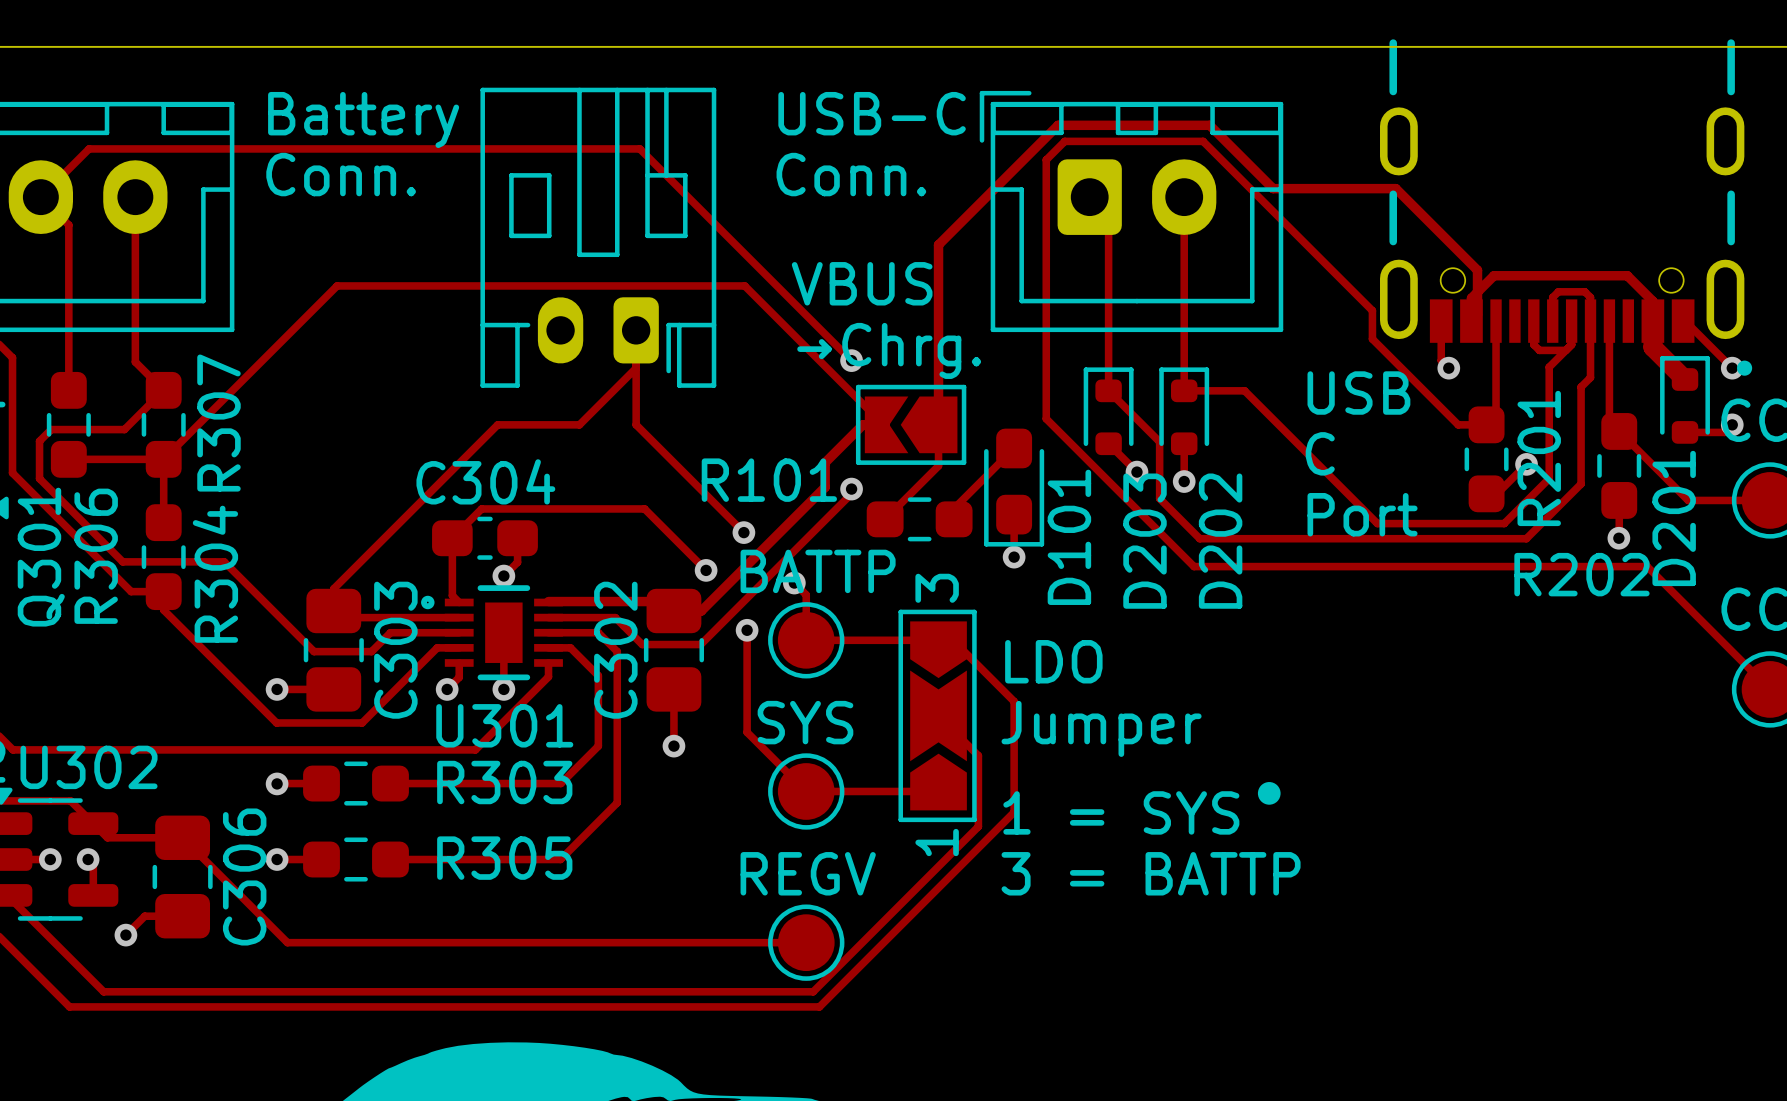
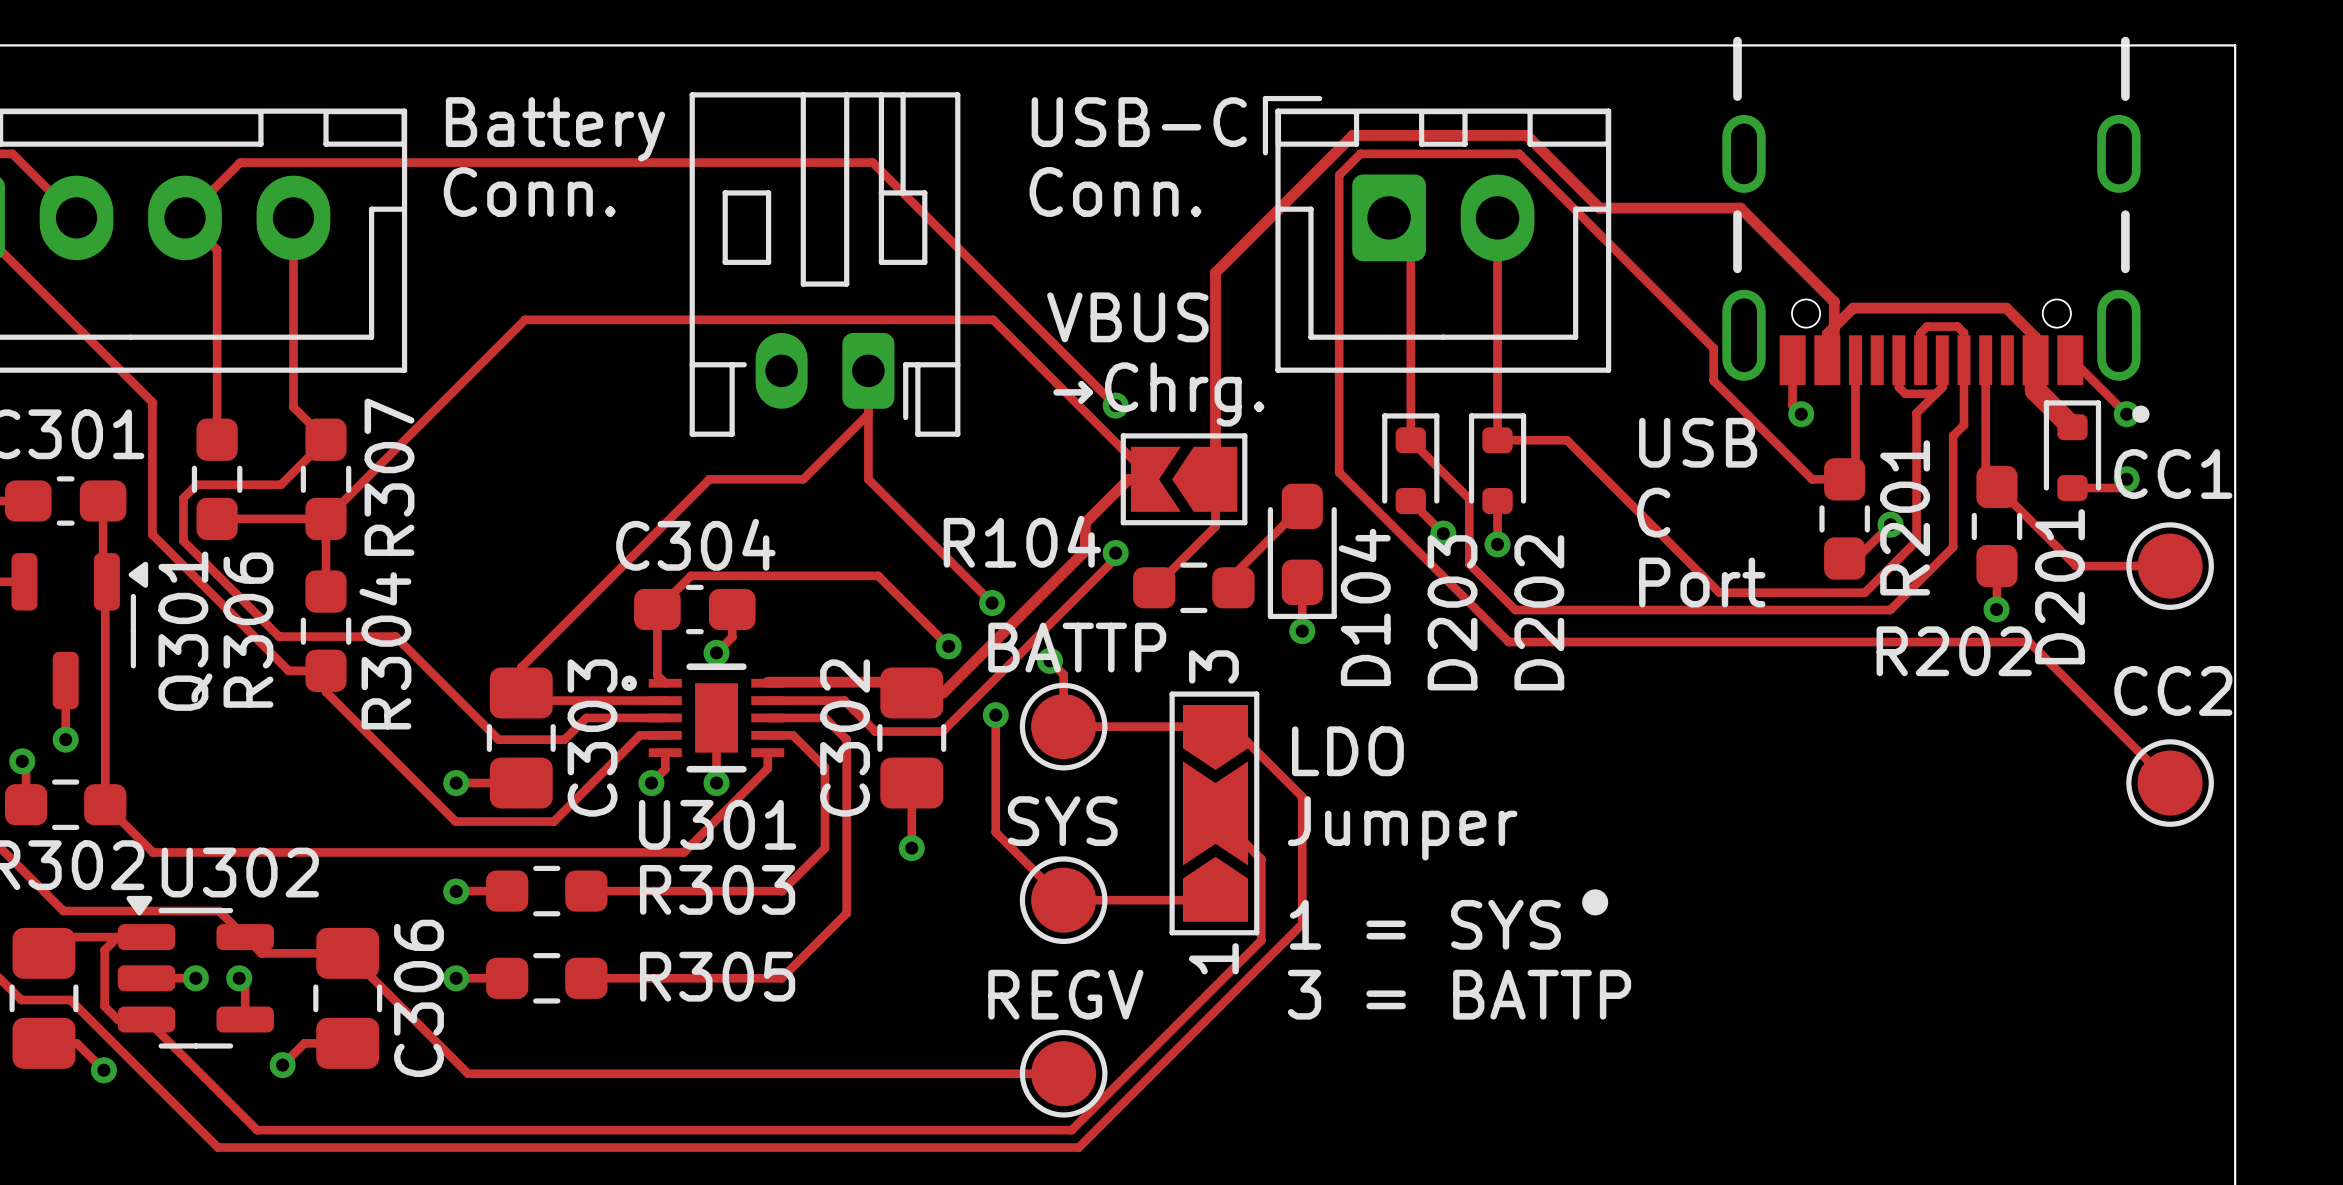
R101 name: R101 (769, 480) -> R104 (1022, 541)
D101 name: D101 (1069, 537) -> D104 (1364, 607)

